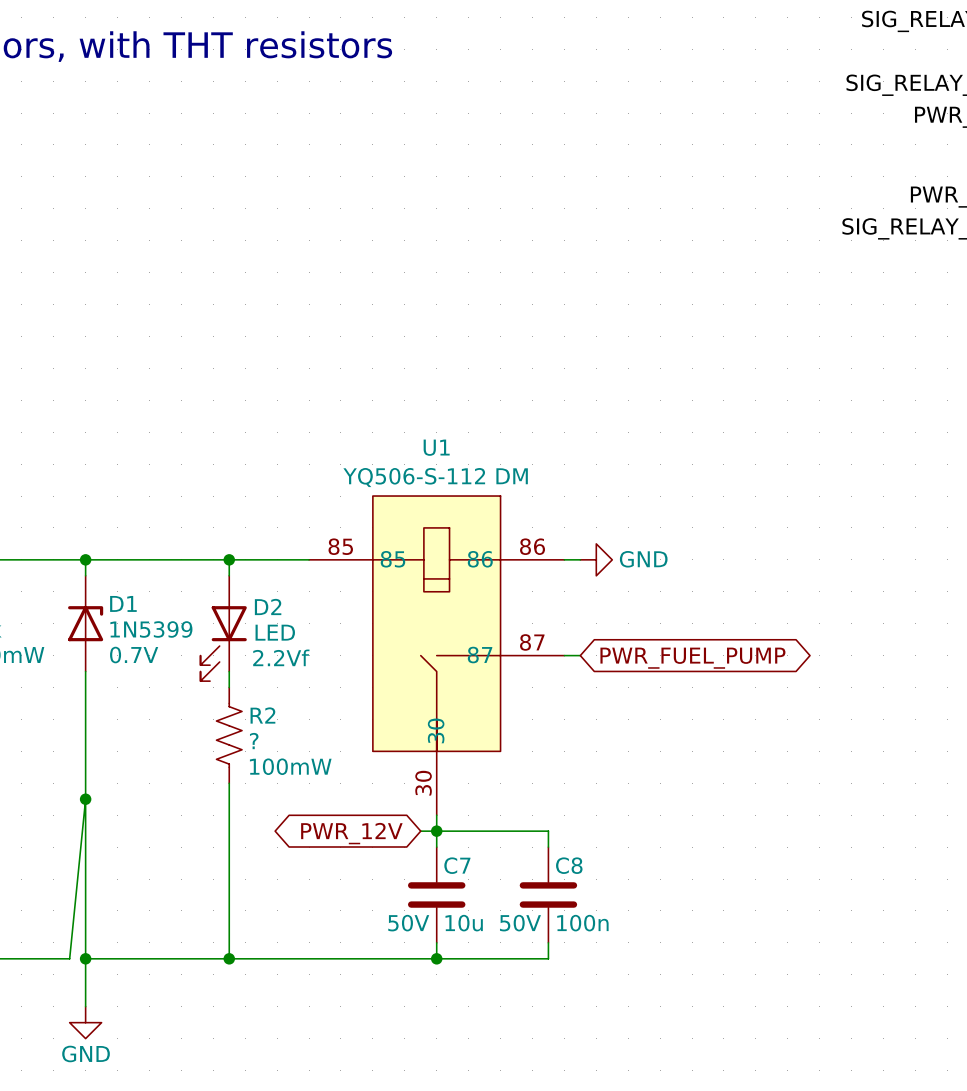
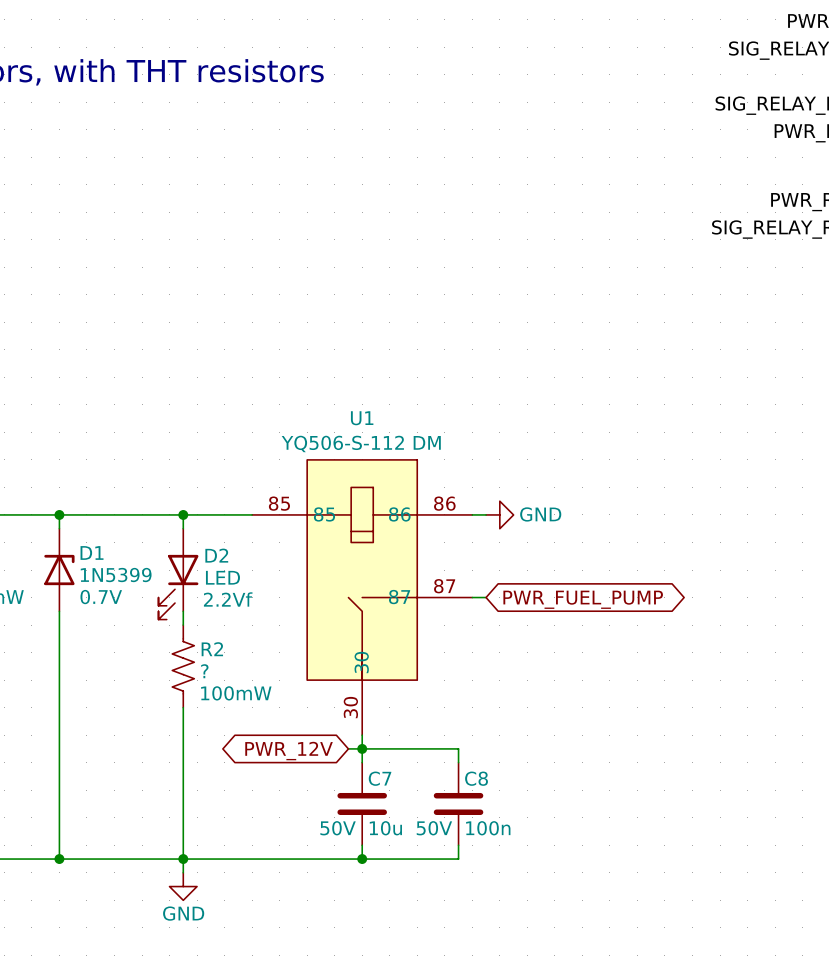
wire: (85, 799) (69, 958) -> none
junction: (85, 799) -> none
wire: (85, 958) (85, 1006) -> (59, 859) (45, 859)
wire: none -> (183, 859) (183, 872)
power symbol position: GND (85, 1022) -> GND (183, 886)

